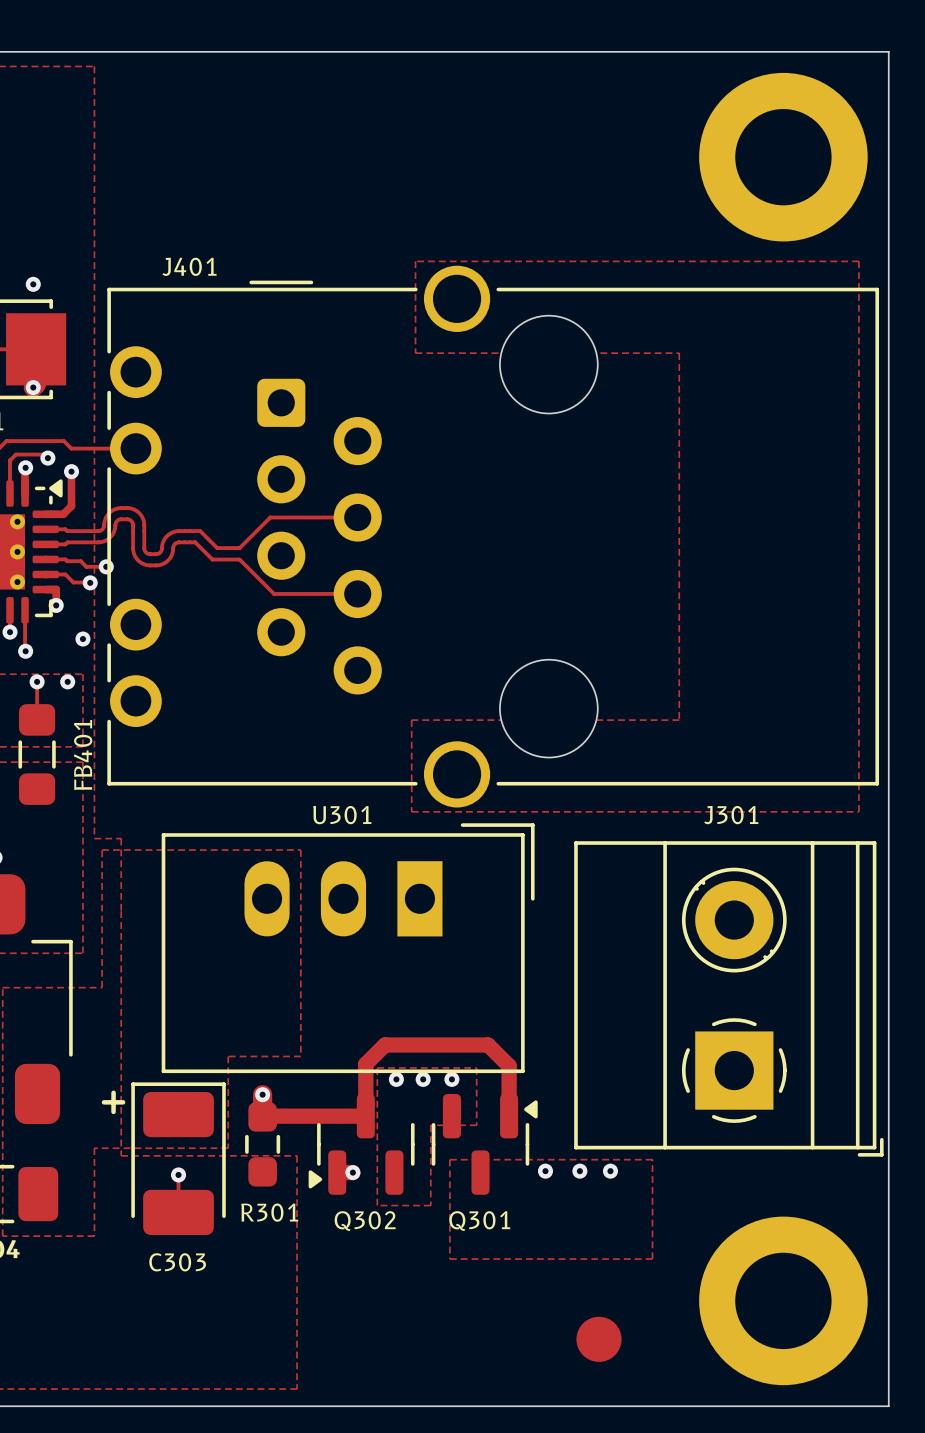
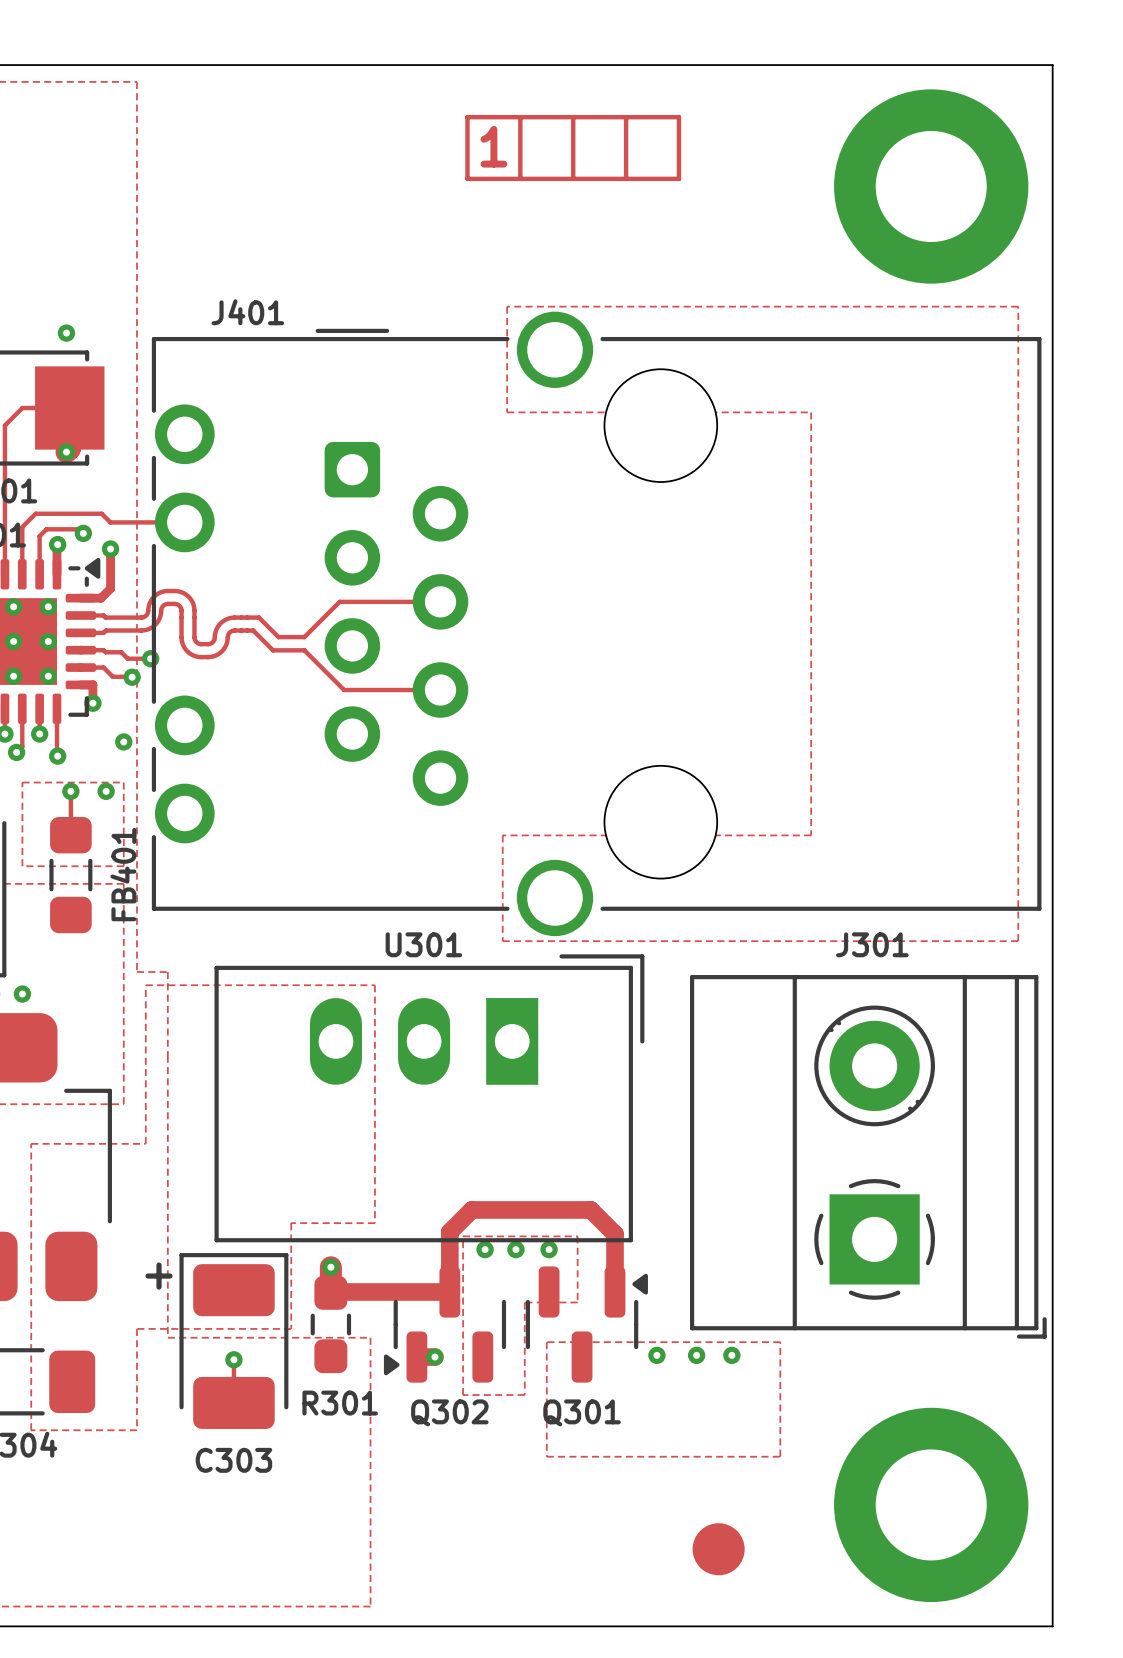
track: none -> (467, 117) (467, 178) (678, 178) (678, 117) (467, 117)
track: none -> (520, 117) (520, 178)
track: none -> (573, 117) (573, 178)
track: none -> (626, 117) (626, 178)
text: none -> 1 (493, 146)

